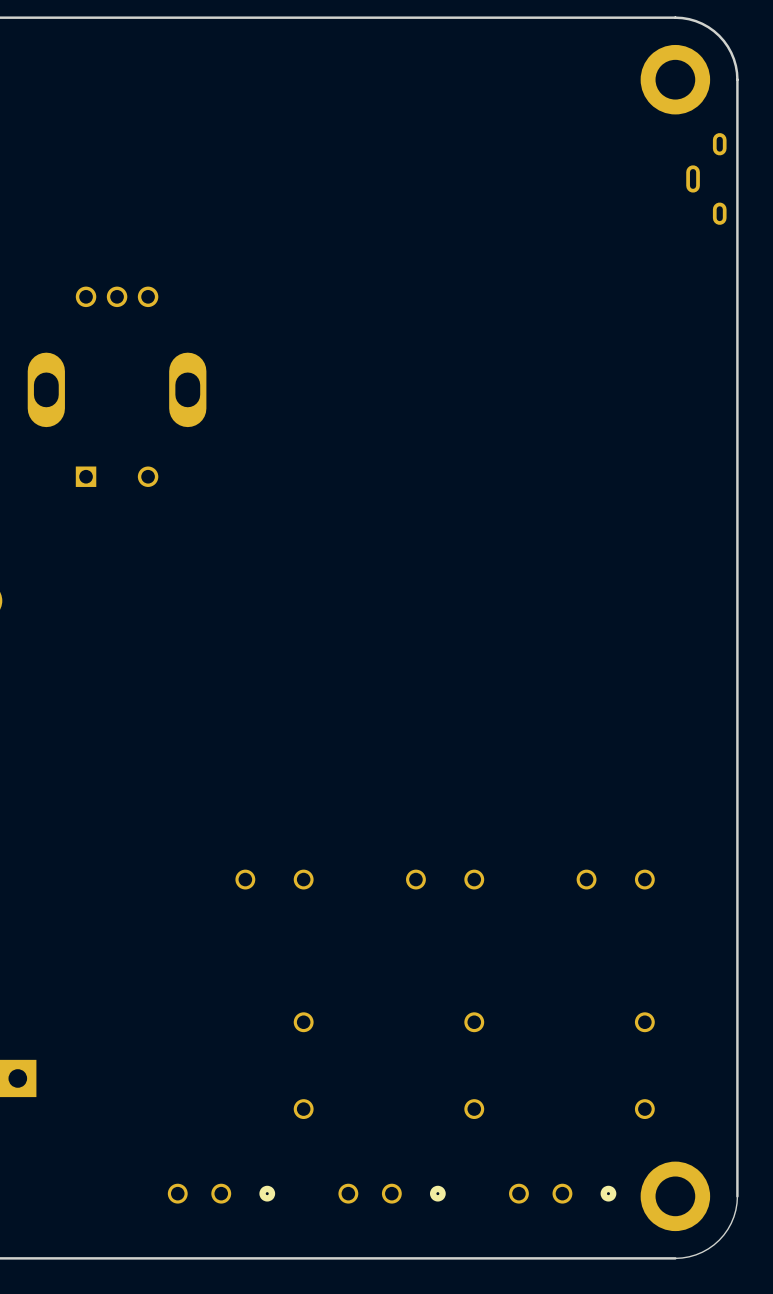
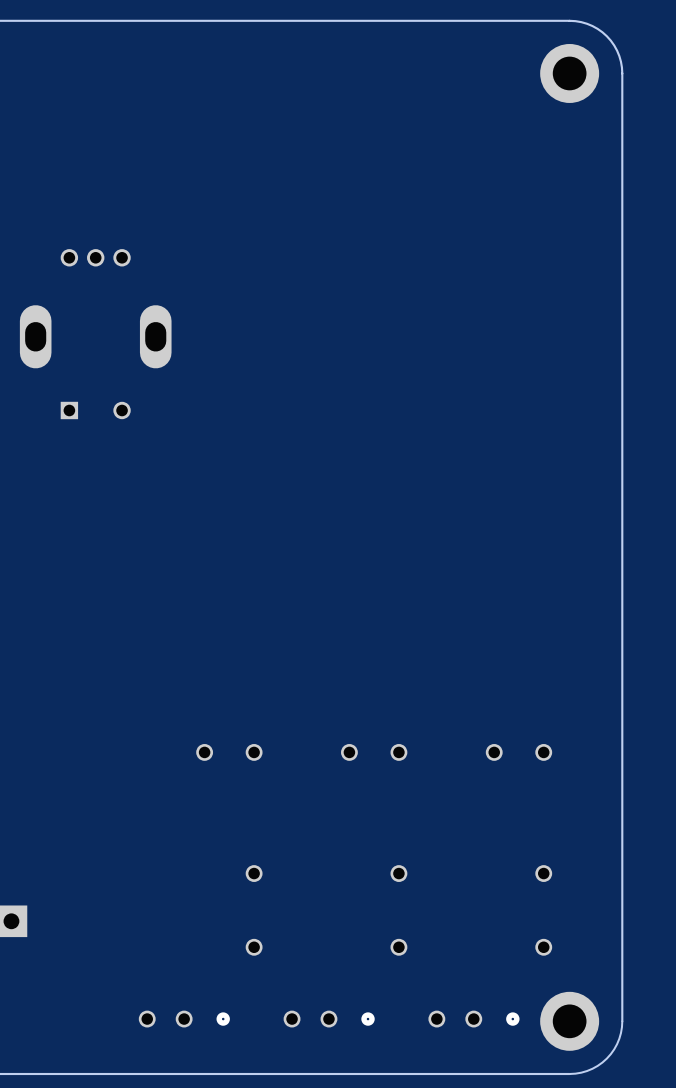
part: (706, 178) -> none

